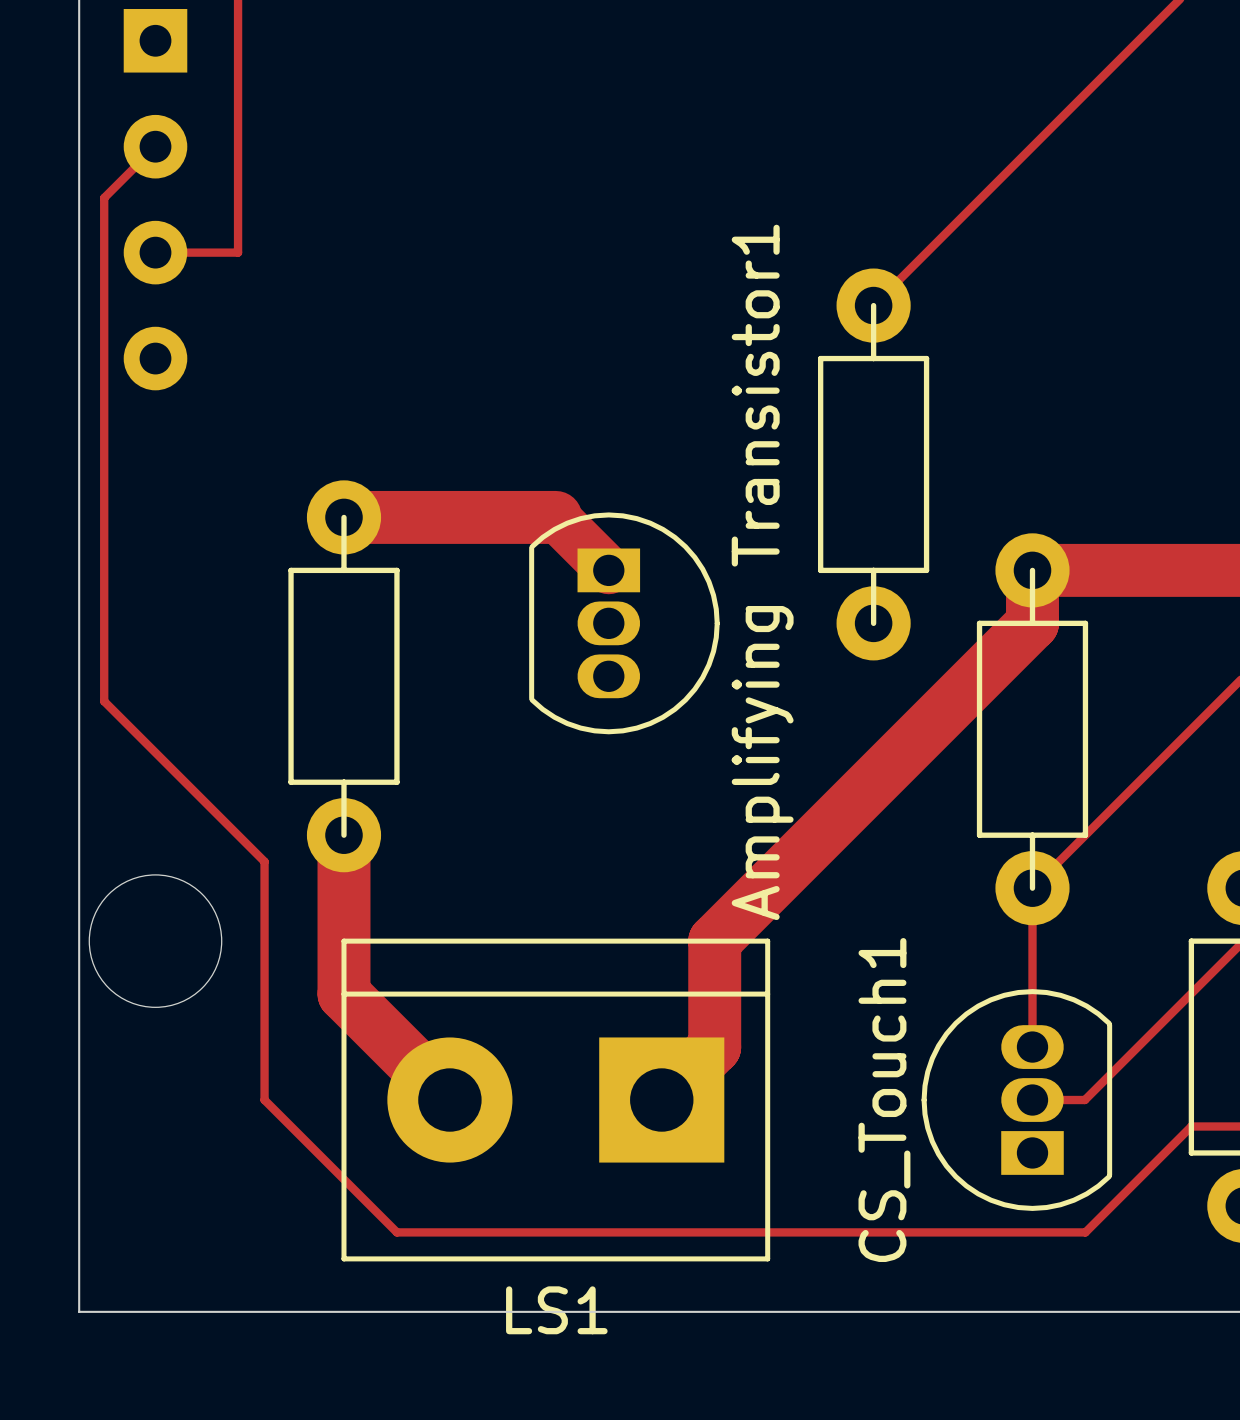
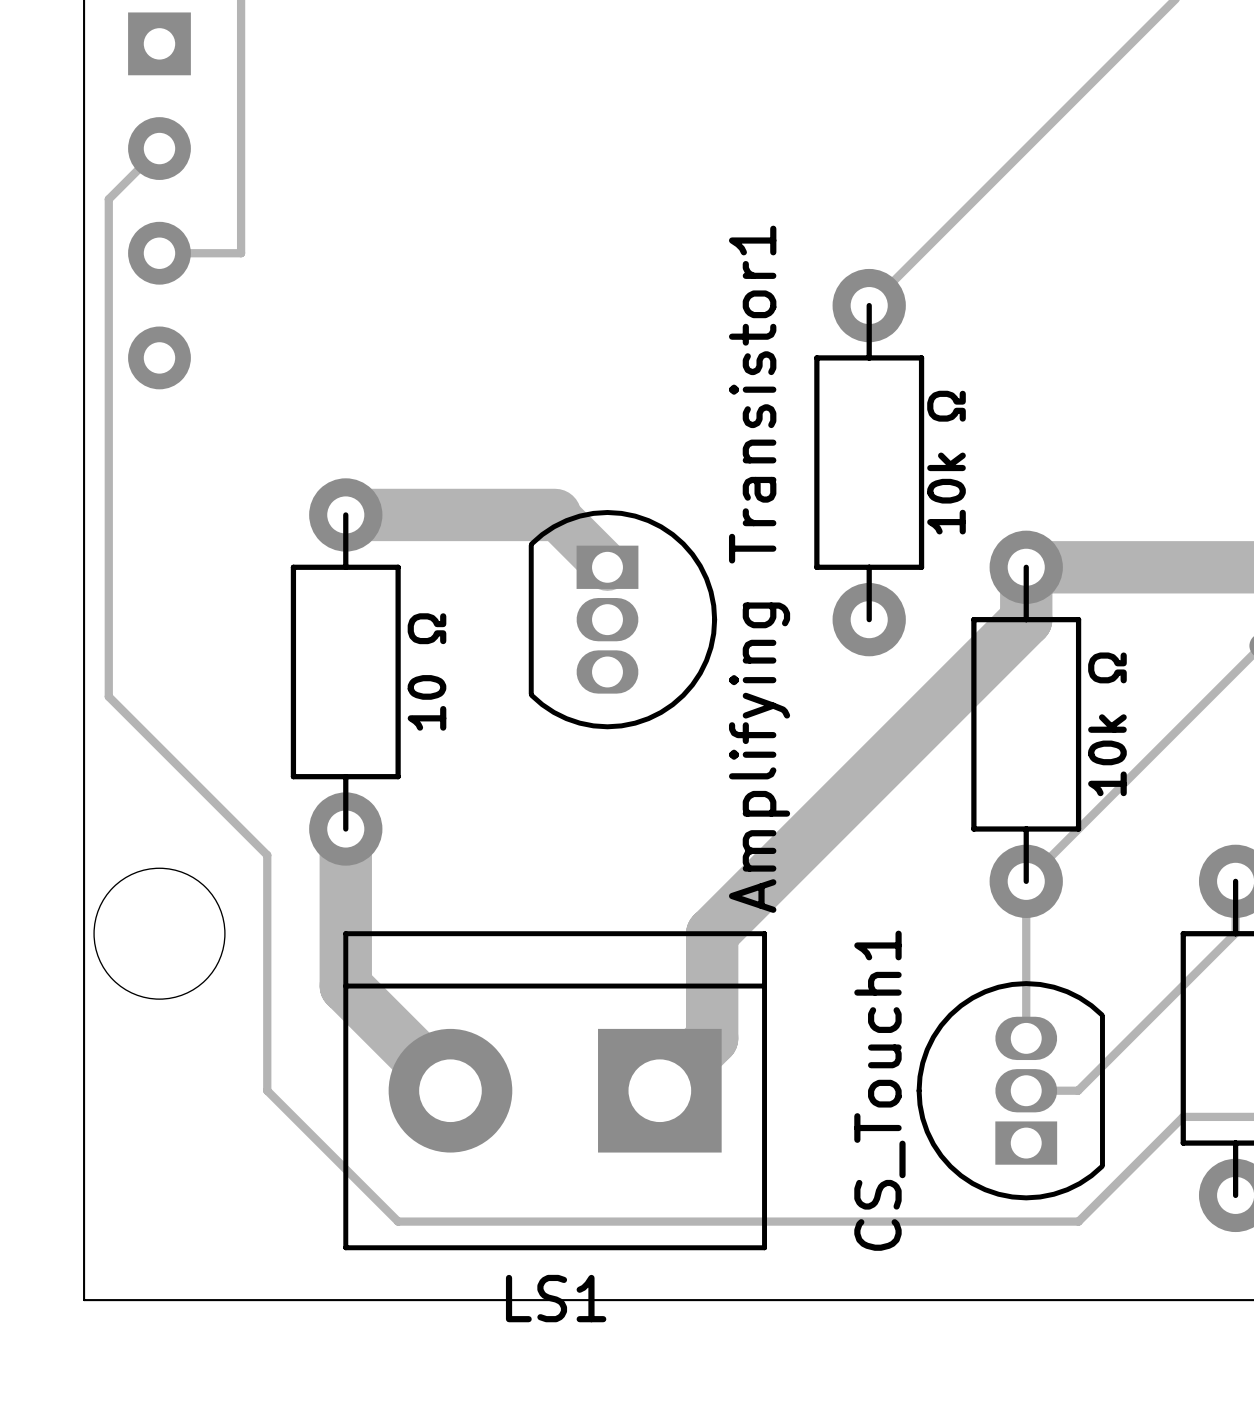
part value: none -> 10k Ω (946, 462)
part value: none -> 10 Ω (426, 671)
part value: none -> 10k Ω (1107, 724)

